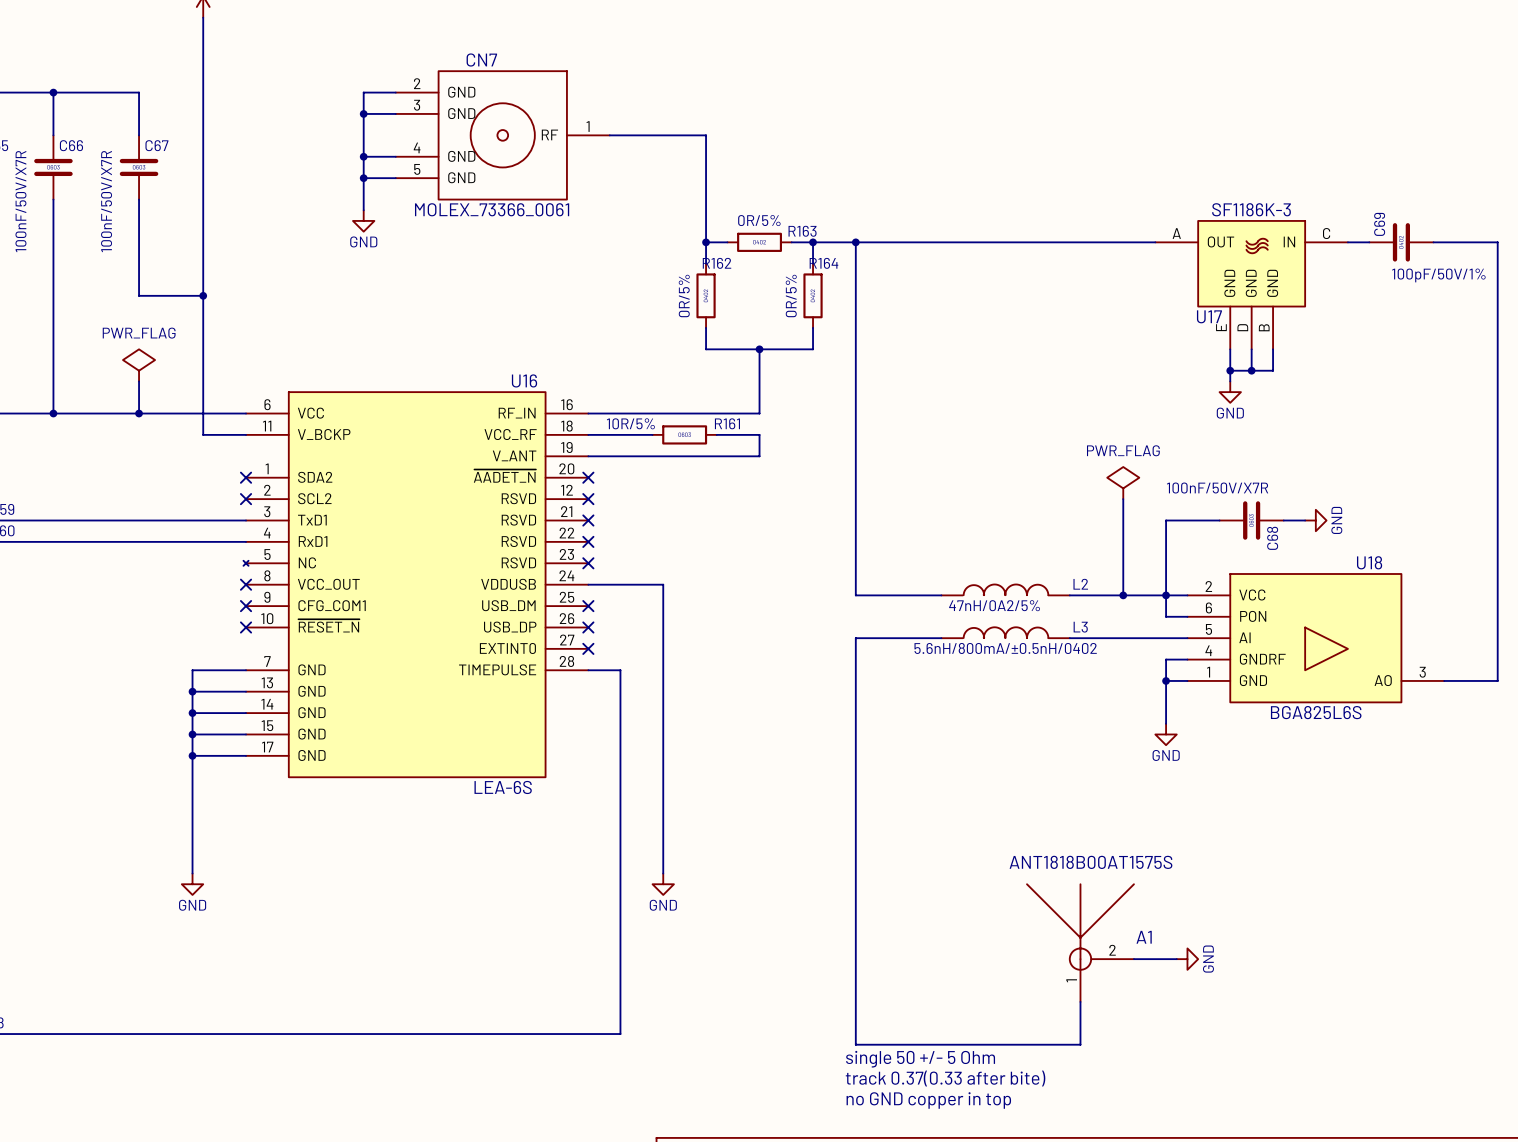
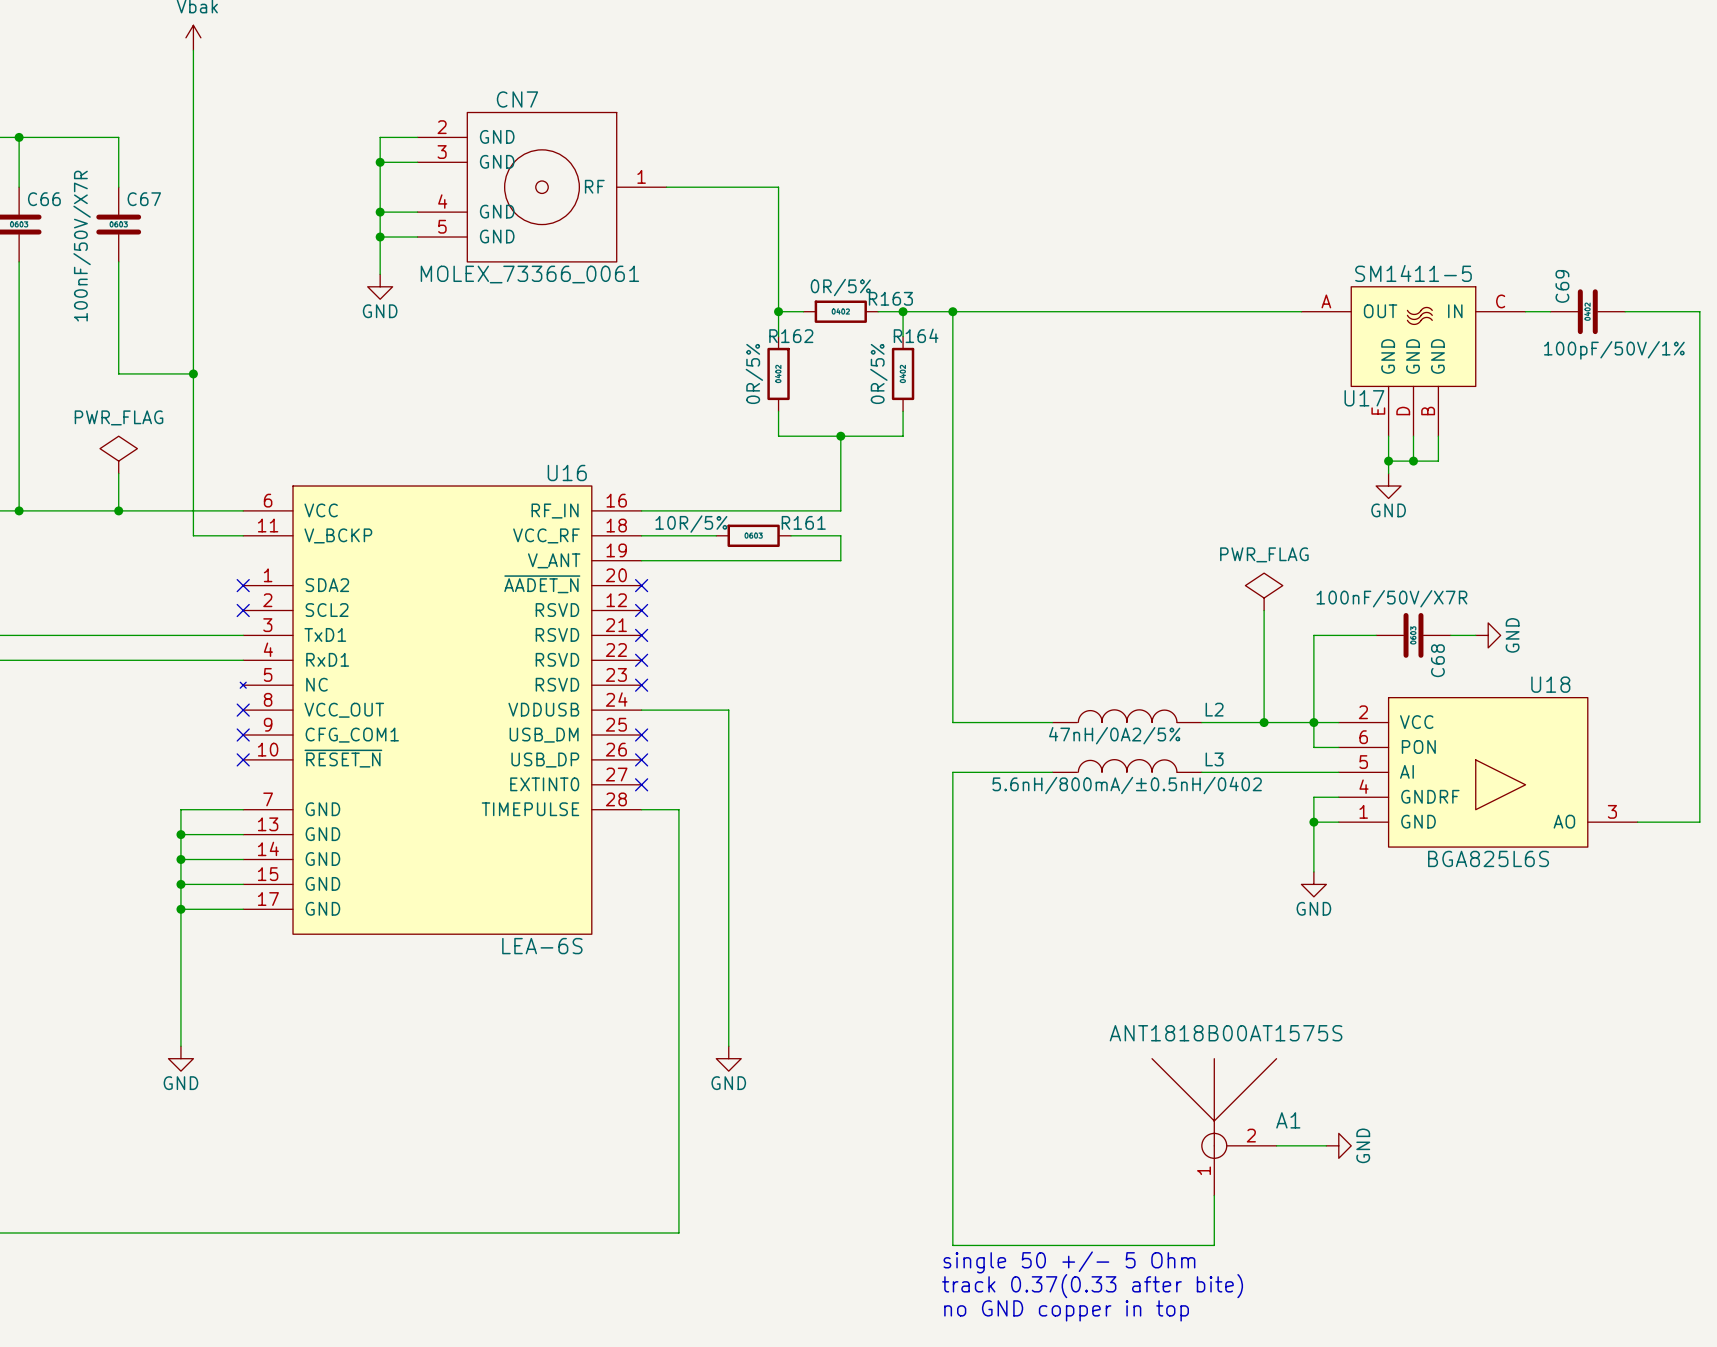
U17 value: SF1186K-3 (1251, 209) -> SM1411-5 (1413, 273)

